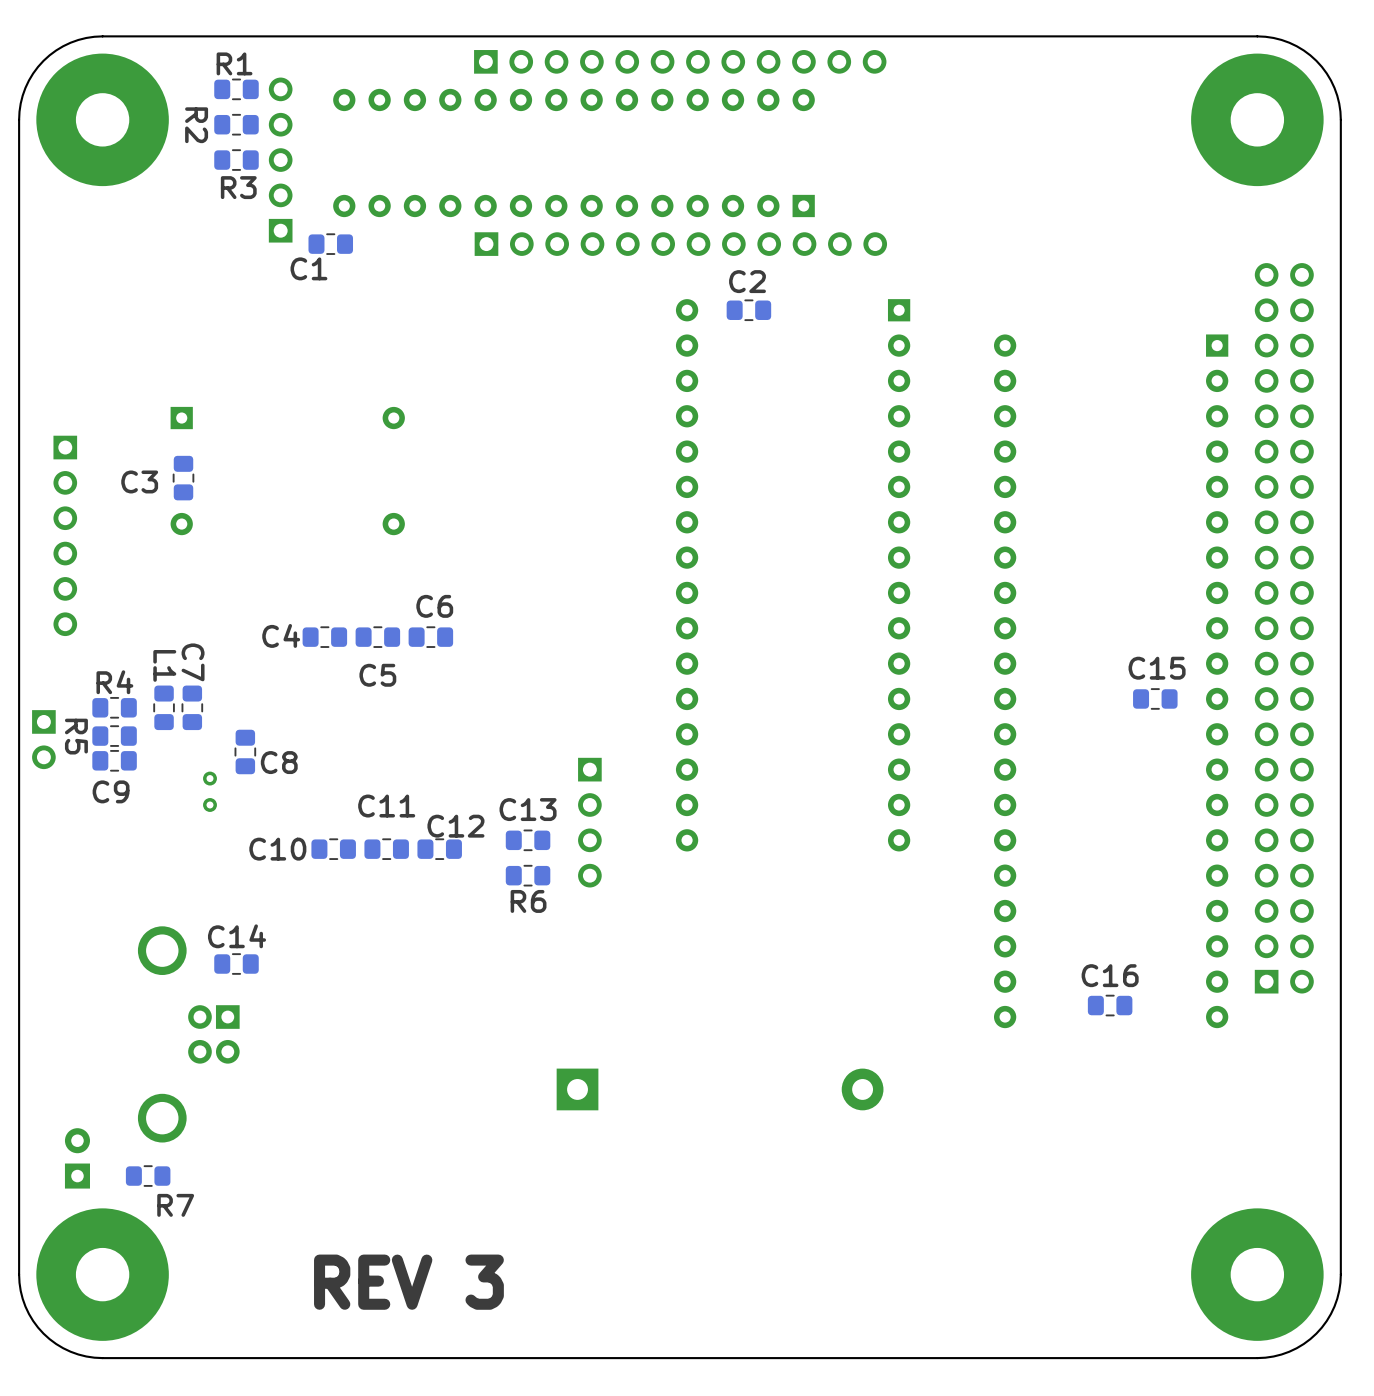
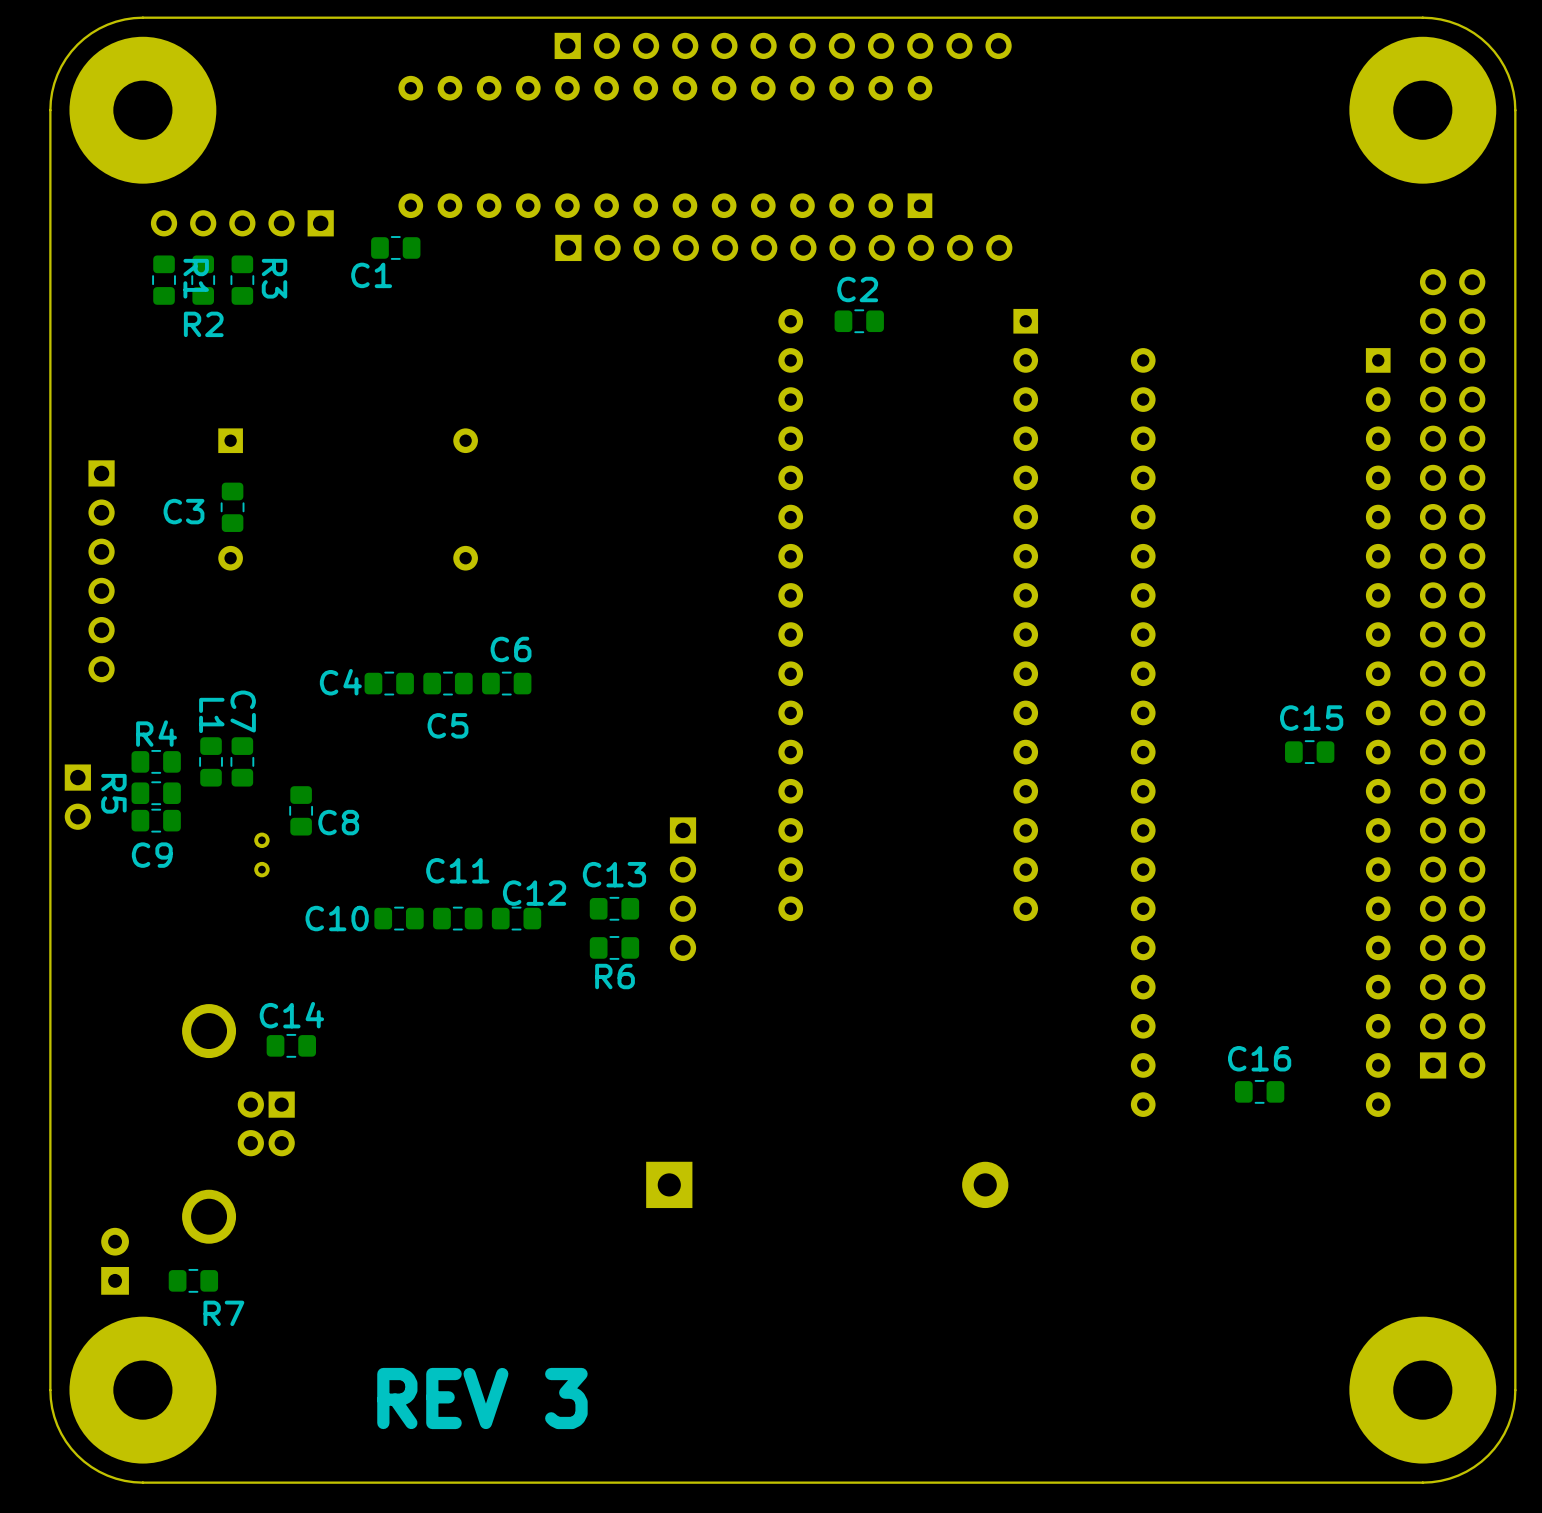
R1 rotation: 0° (236, 89) -> 90° clockwise (164, 280)
R1 position: (236, 89) -> (164, 280)
R2 rotation: 0° (236, 124) -> 90° clockwise (203, 280)
R2 position: (236, 124) -> (203, 280)
R2 name position: R2 (196, 125) -> R2 (203, 324)
R3 rotation: 0° (236, 160) -> 90° clockwise (242, 280)
R3 position: (236, 160) -> (242, 280)
part rotation: 0° (280, 160) -> 90° counterclockwise (242, 223)
part position: (280, 160) -> (242, 223)
R3 name position: R3 (238, 187) -> R3 (274, 278)

